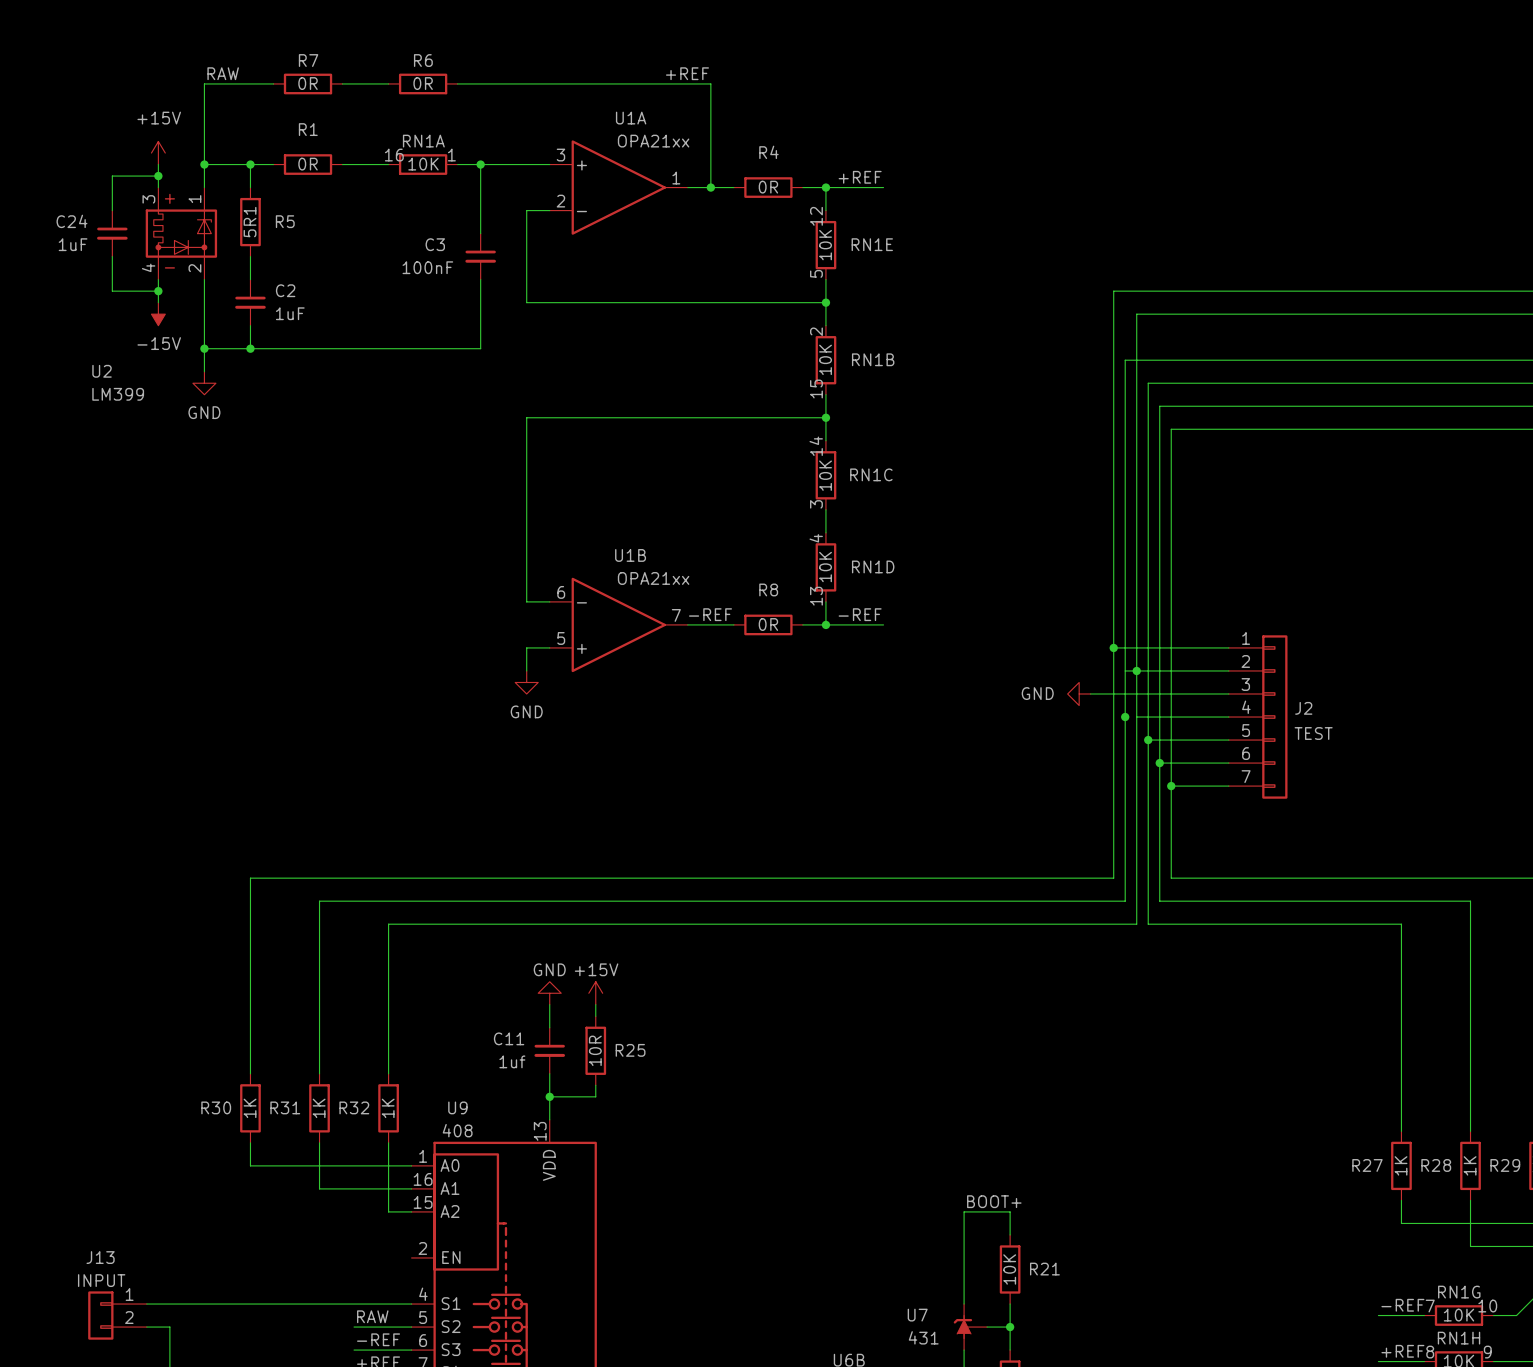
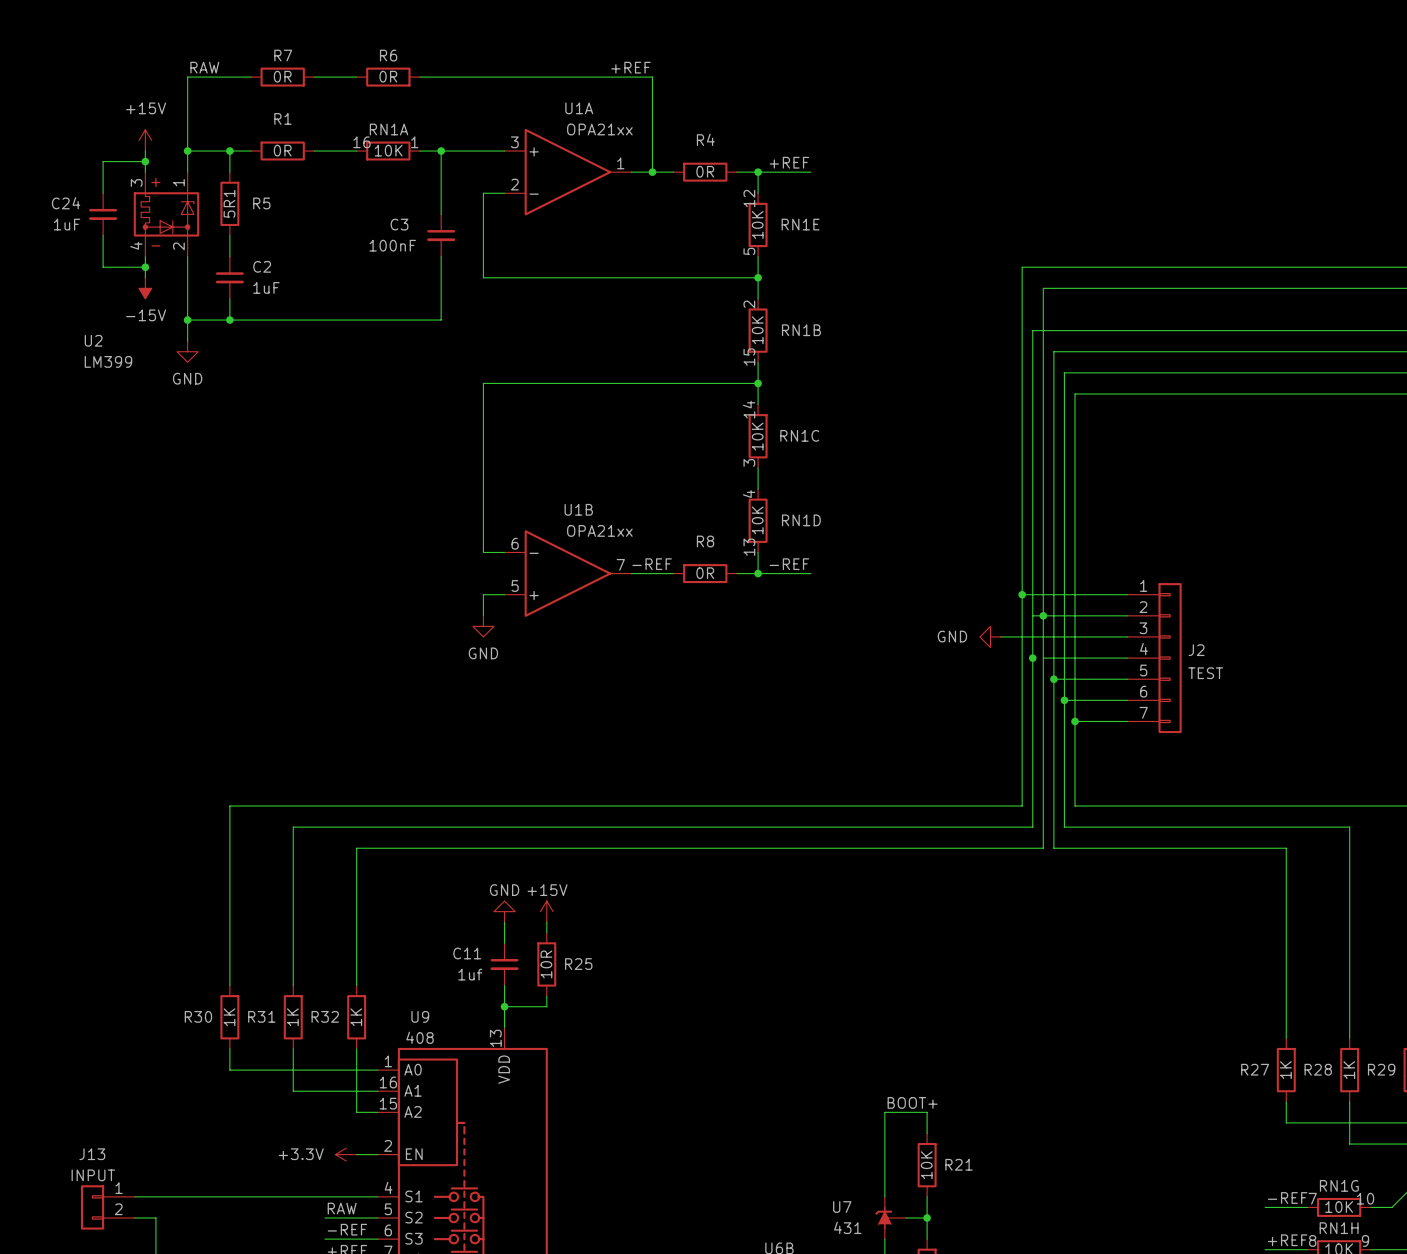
power symbol: none -> +3.3V (346, 1154)
wire: none -> (356, 1154) (377, 1154)

